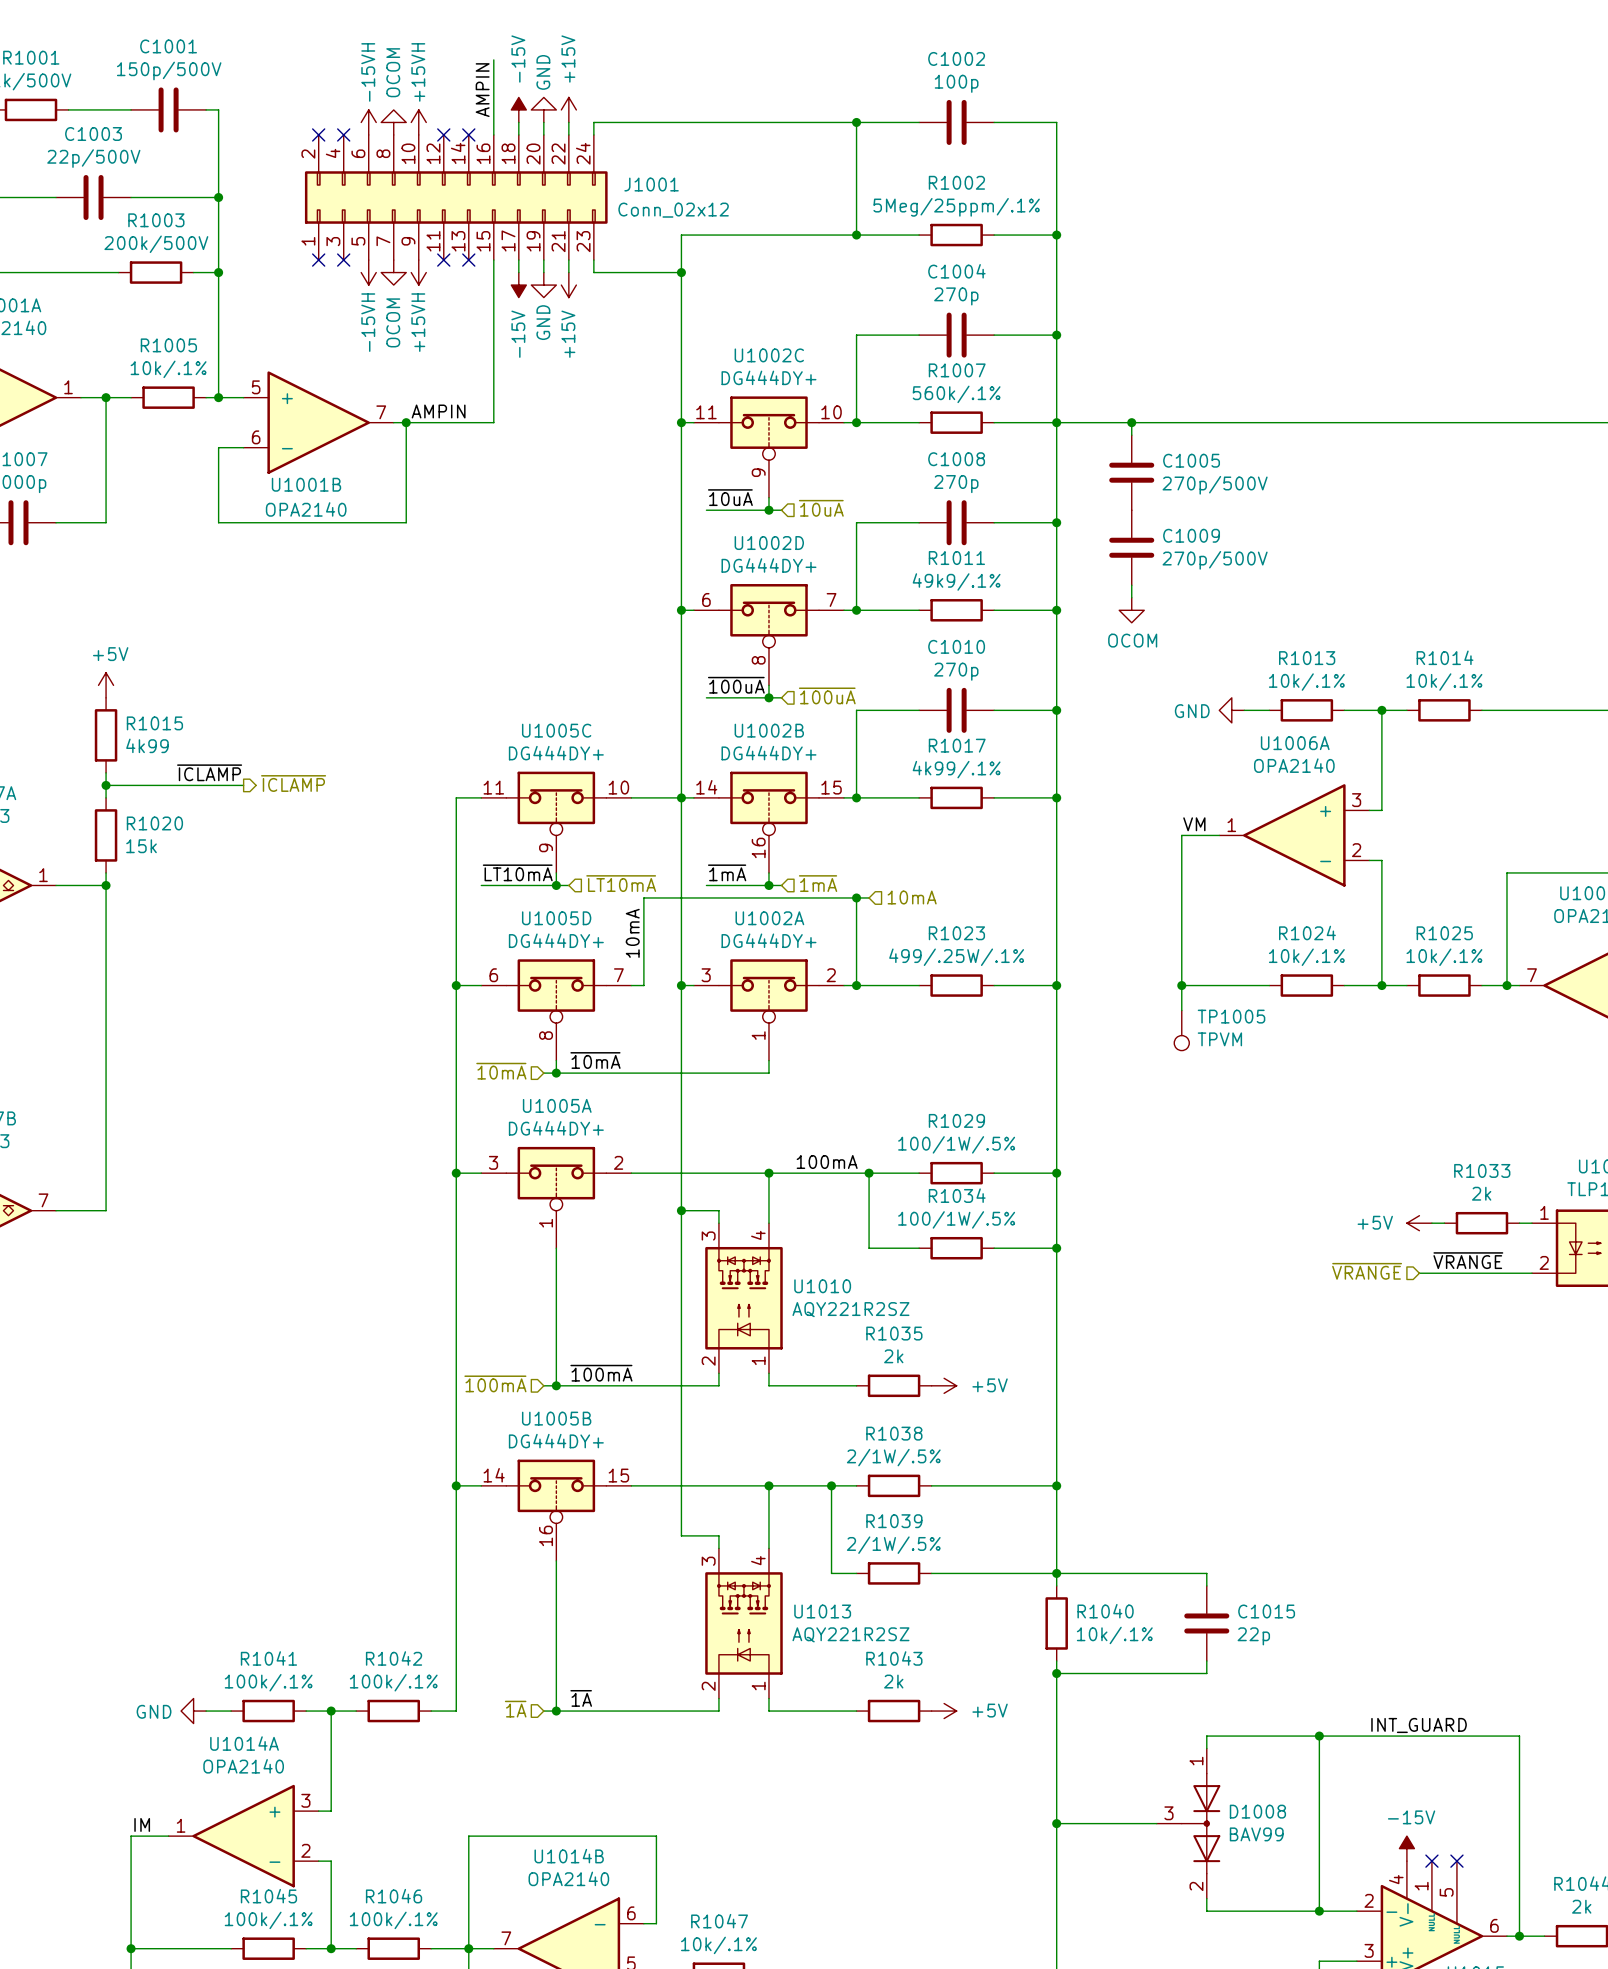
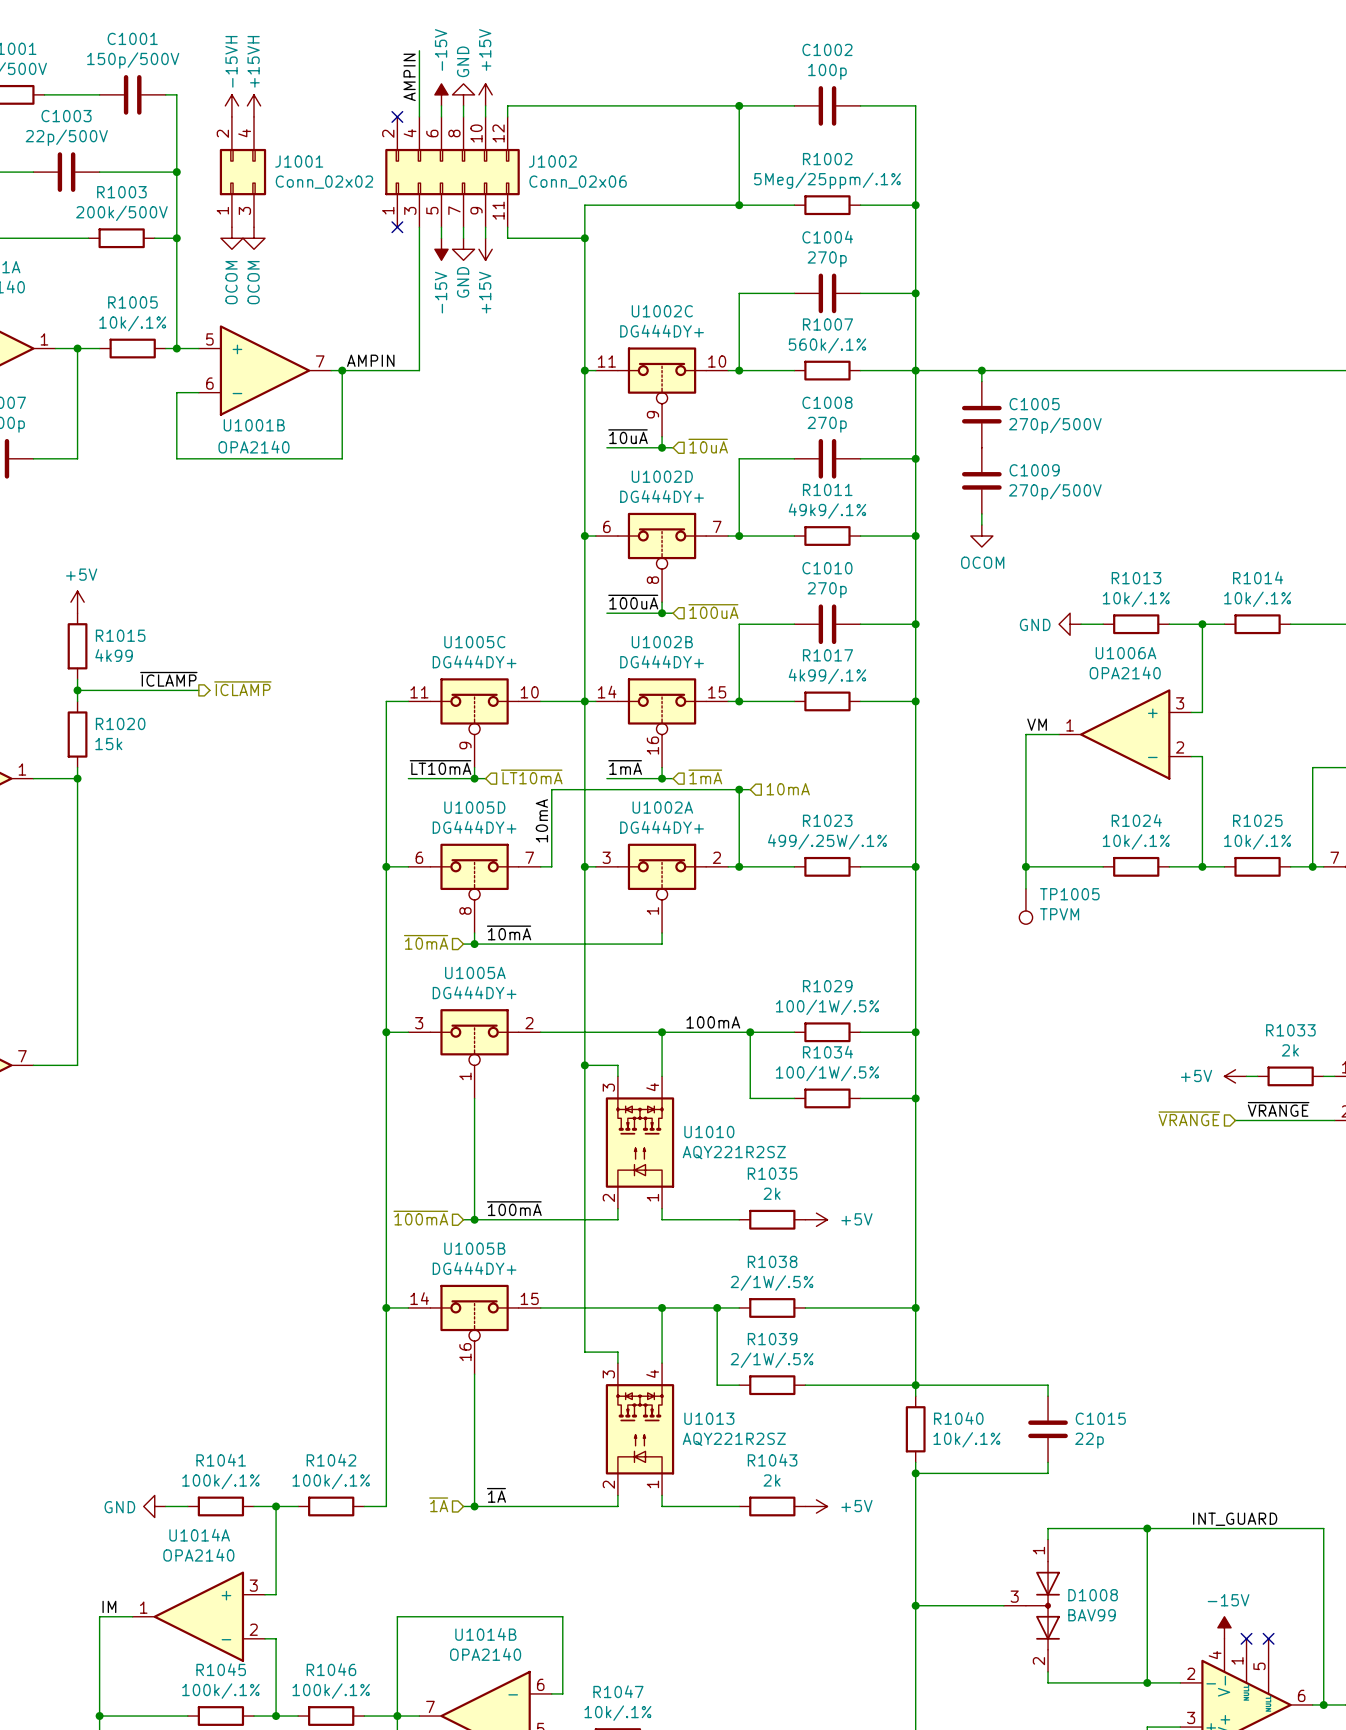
power symbol: none -> -15VH (231, 105)
power symbol: none -> +15VH (254, 105)
power symbol: -15VH (368, 122) -> none
power symbol: OCOM (393, 122) -> none
power symbol: +15VH (418, 122) -> none
J1001 symbol: [304, 134, 608, 261] -> [219, 116, 267, 228]
no-connect mark: (318, 134) -> none
no-connect mark: (343, 134) -> none
no-connect mark: (443, 134) -> none
J1001 name position: J1001 (651, 184) -> J1001 (299, 161)
J1002: none -> Conn_02x06 (452, 172)
J1001 value: Conn_02x12 (673, 210) -> Conn_02x02 (324, 182)
no-connect mark: (318, 260) -> none
no-connect mark: (343, 260) -> none
no-connect mark: (443, 260) -> none
power symbol: none -> OCOM (231, 238)
power symbol: none -> OCOM (254, 238)
power symbol: -15VH (368, 272) -> none
power symbol: OCOM (393, 272) -> none
power symbol: +15VH (418, 272) -> none

